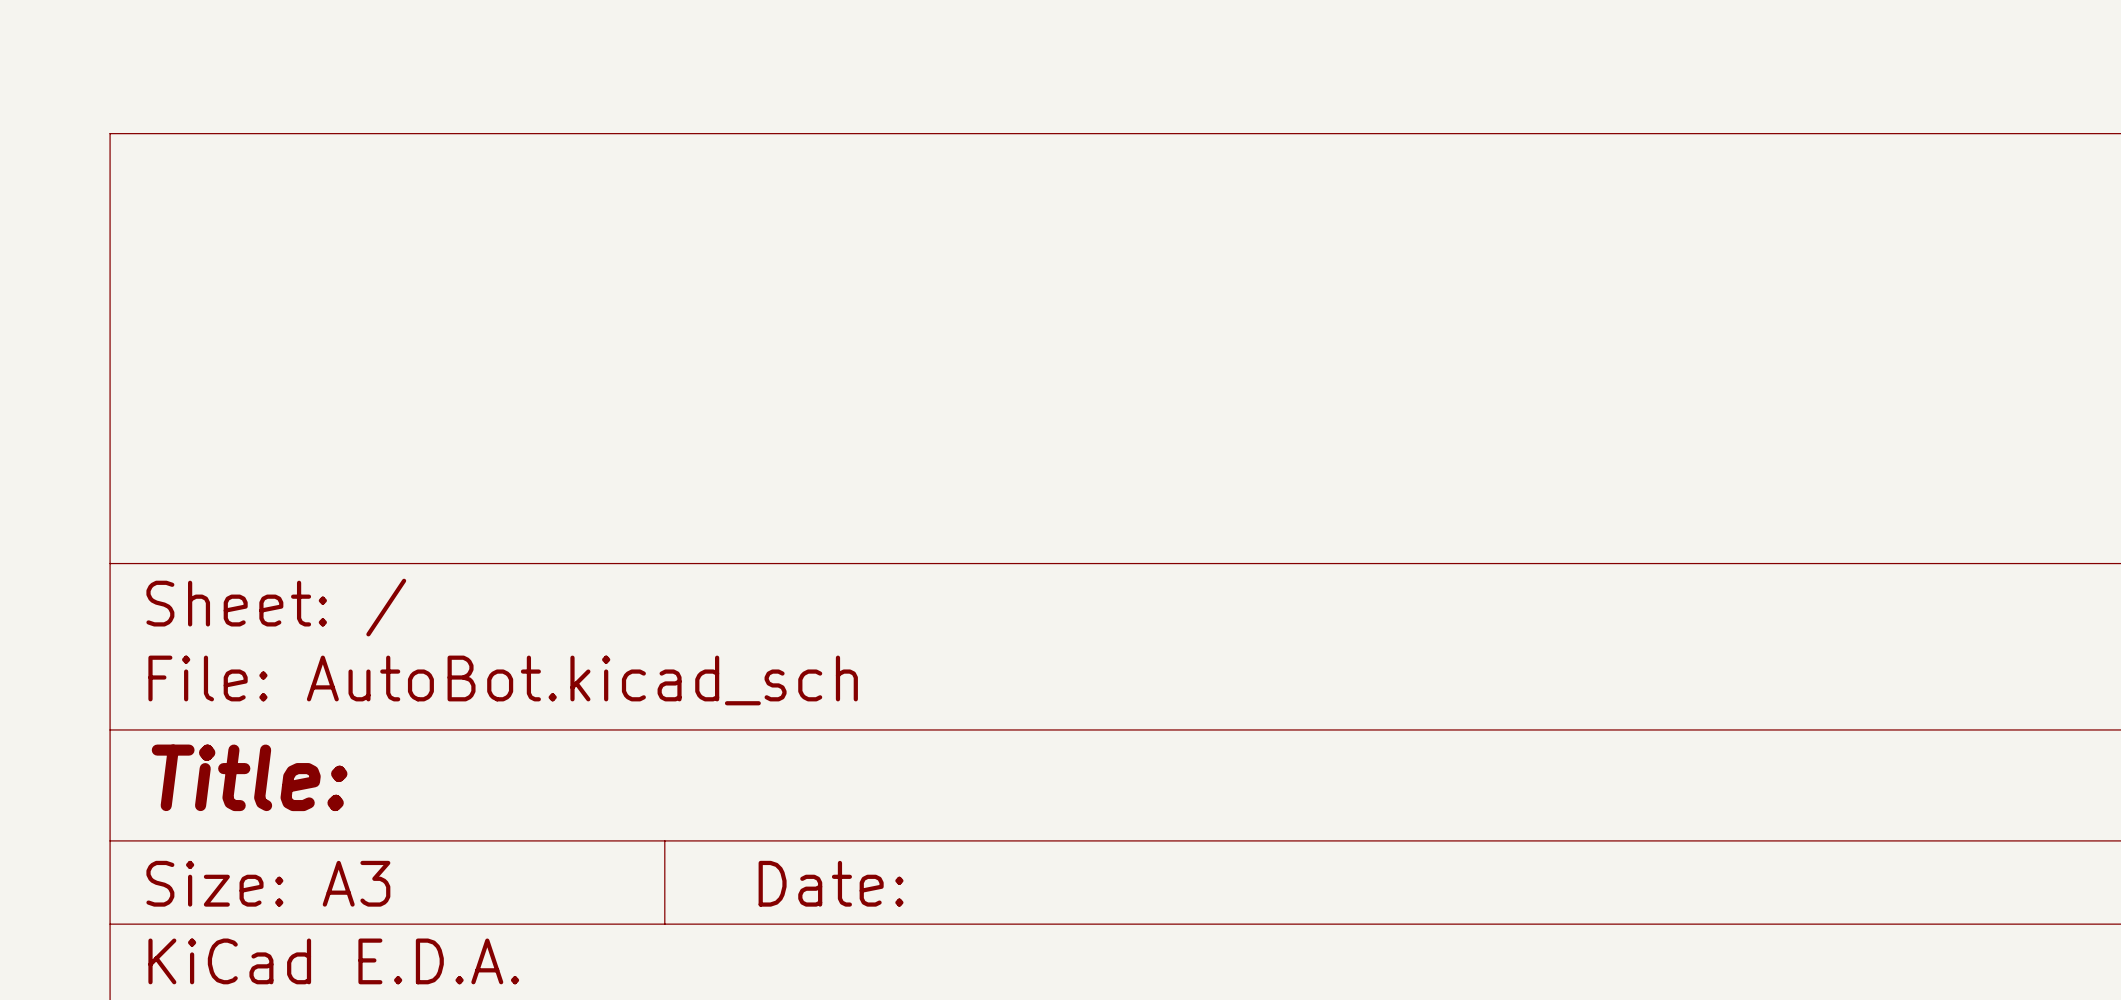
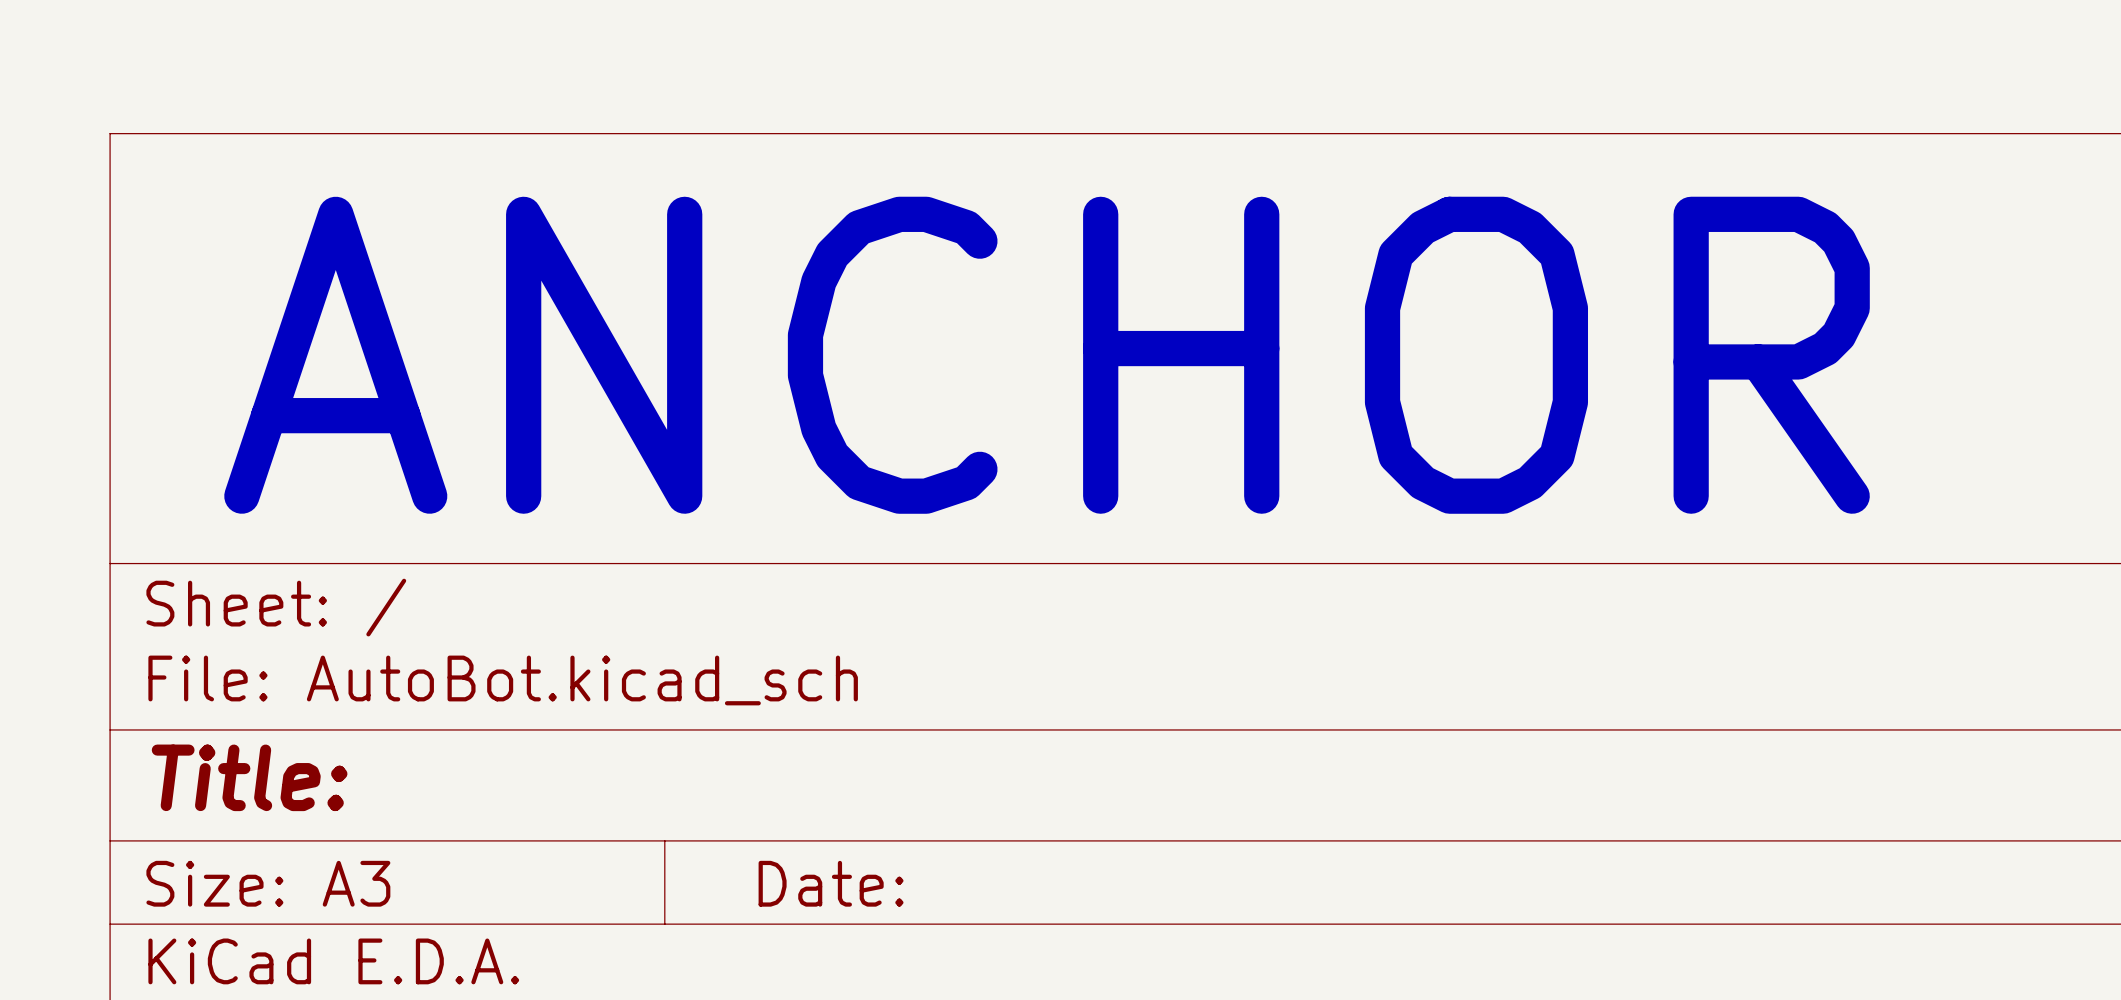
text: none -> ANCHOR (1047, 355)

